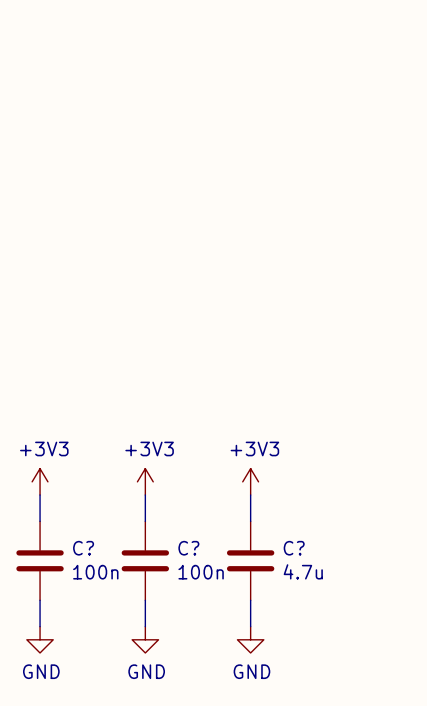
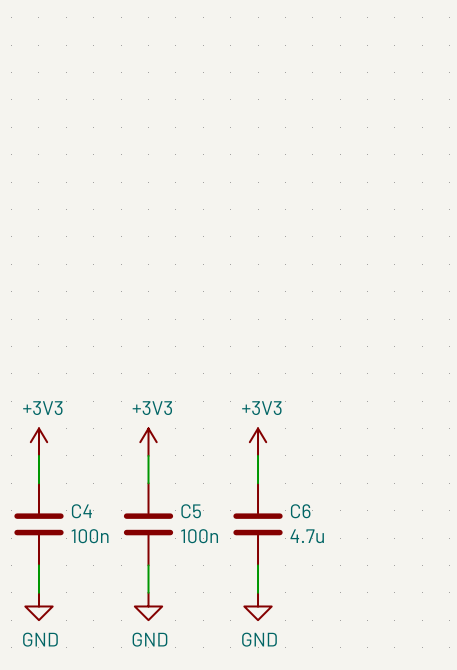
C? name: C? (83, 548) -> C4 (81, 511)
C? name: C? (188, 548) -> C5 (191, 511)
C? name: C? (294, 548) -> C6 (300, 511)

